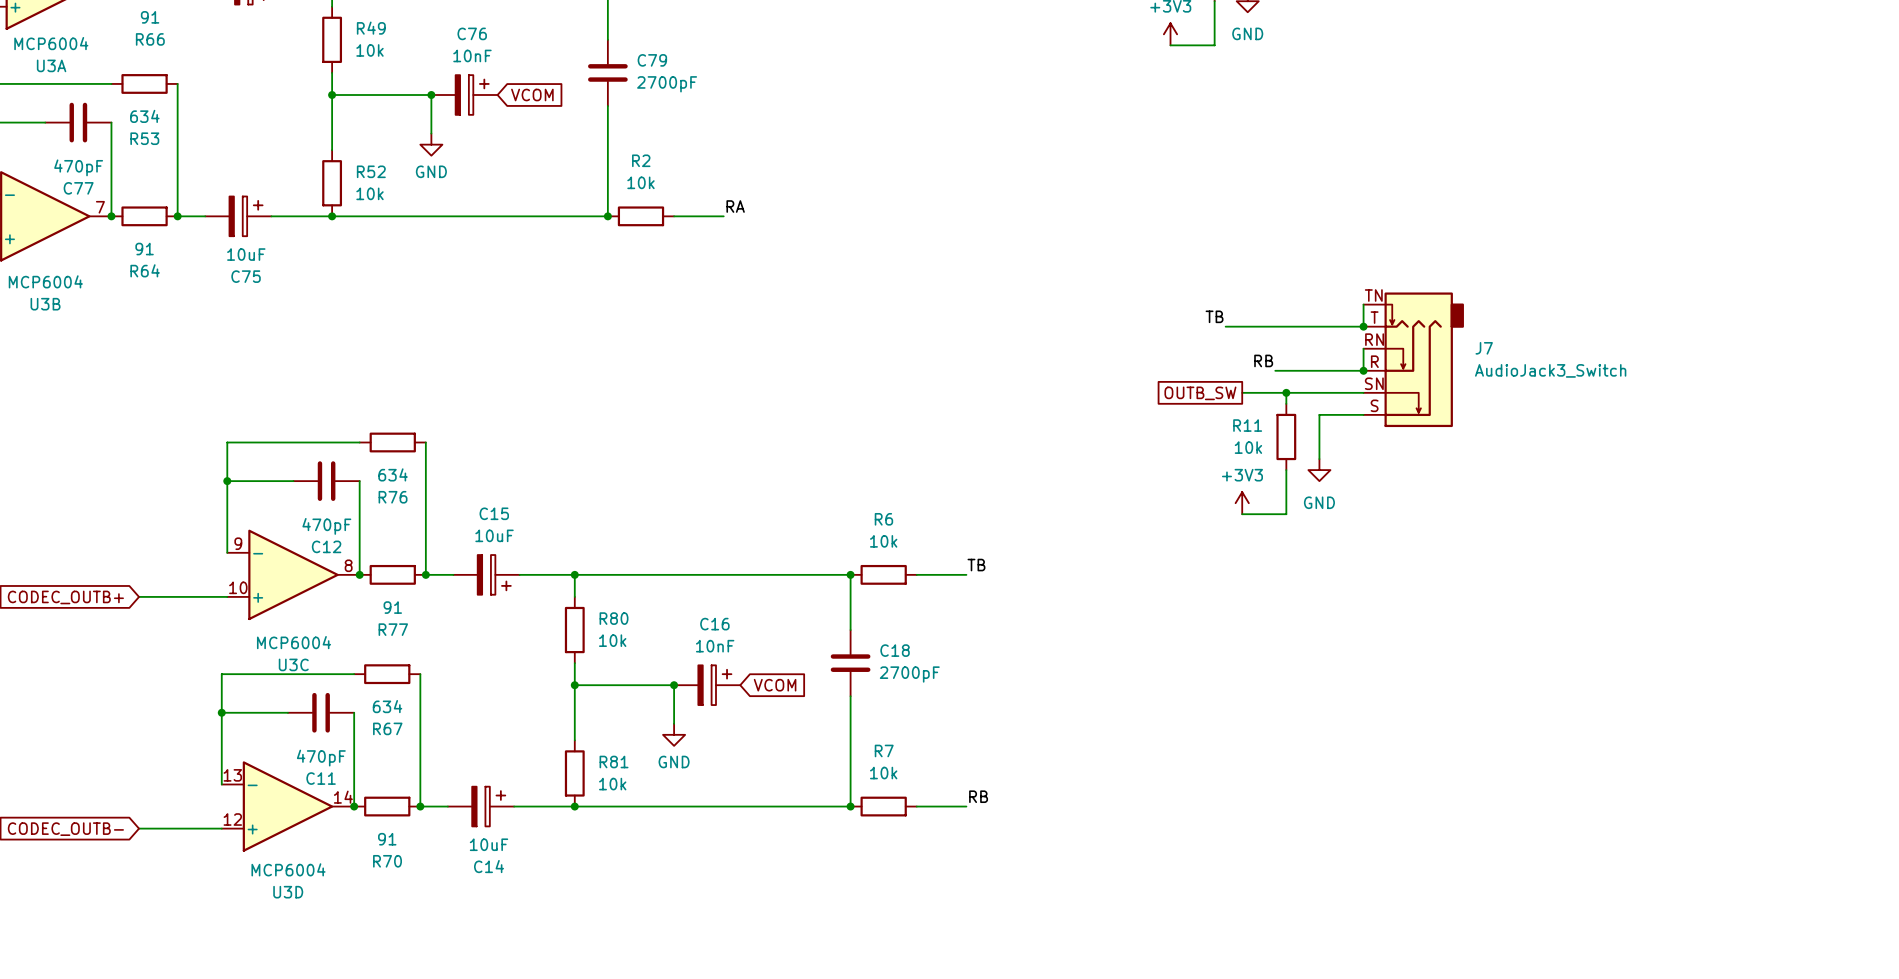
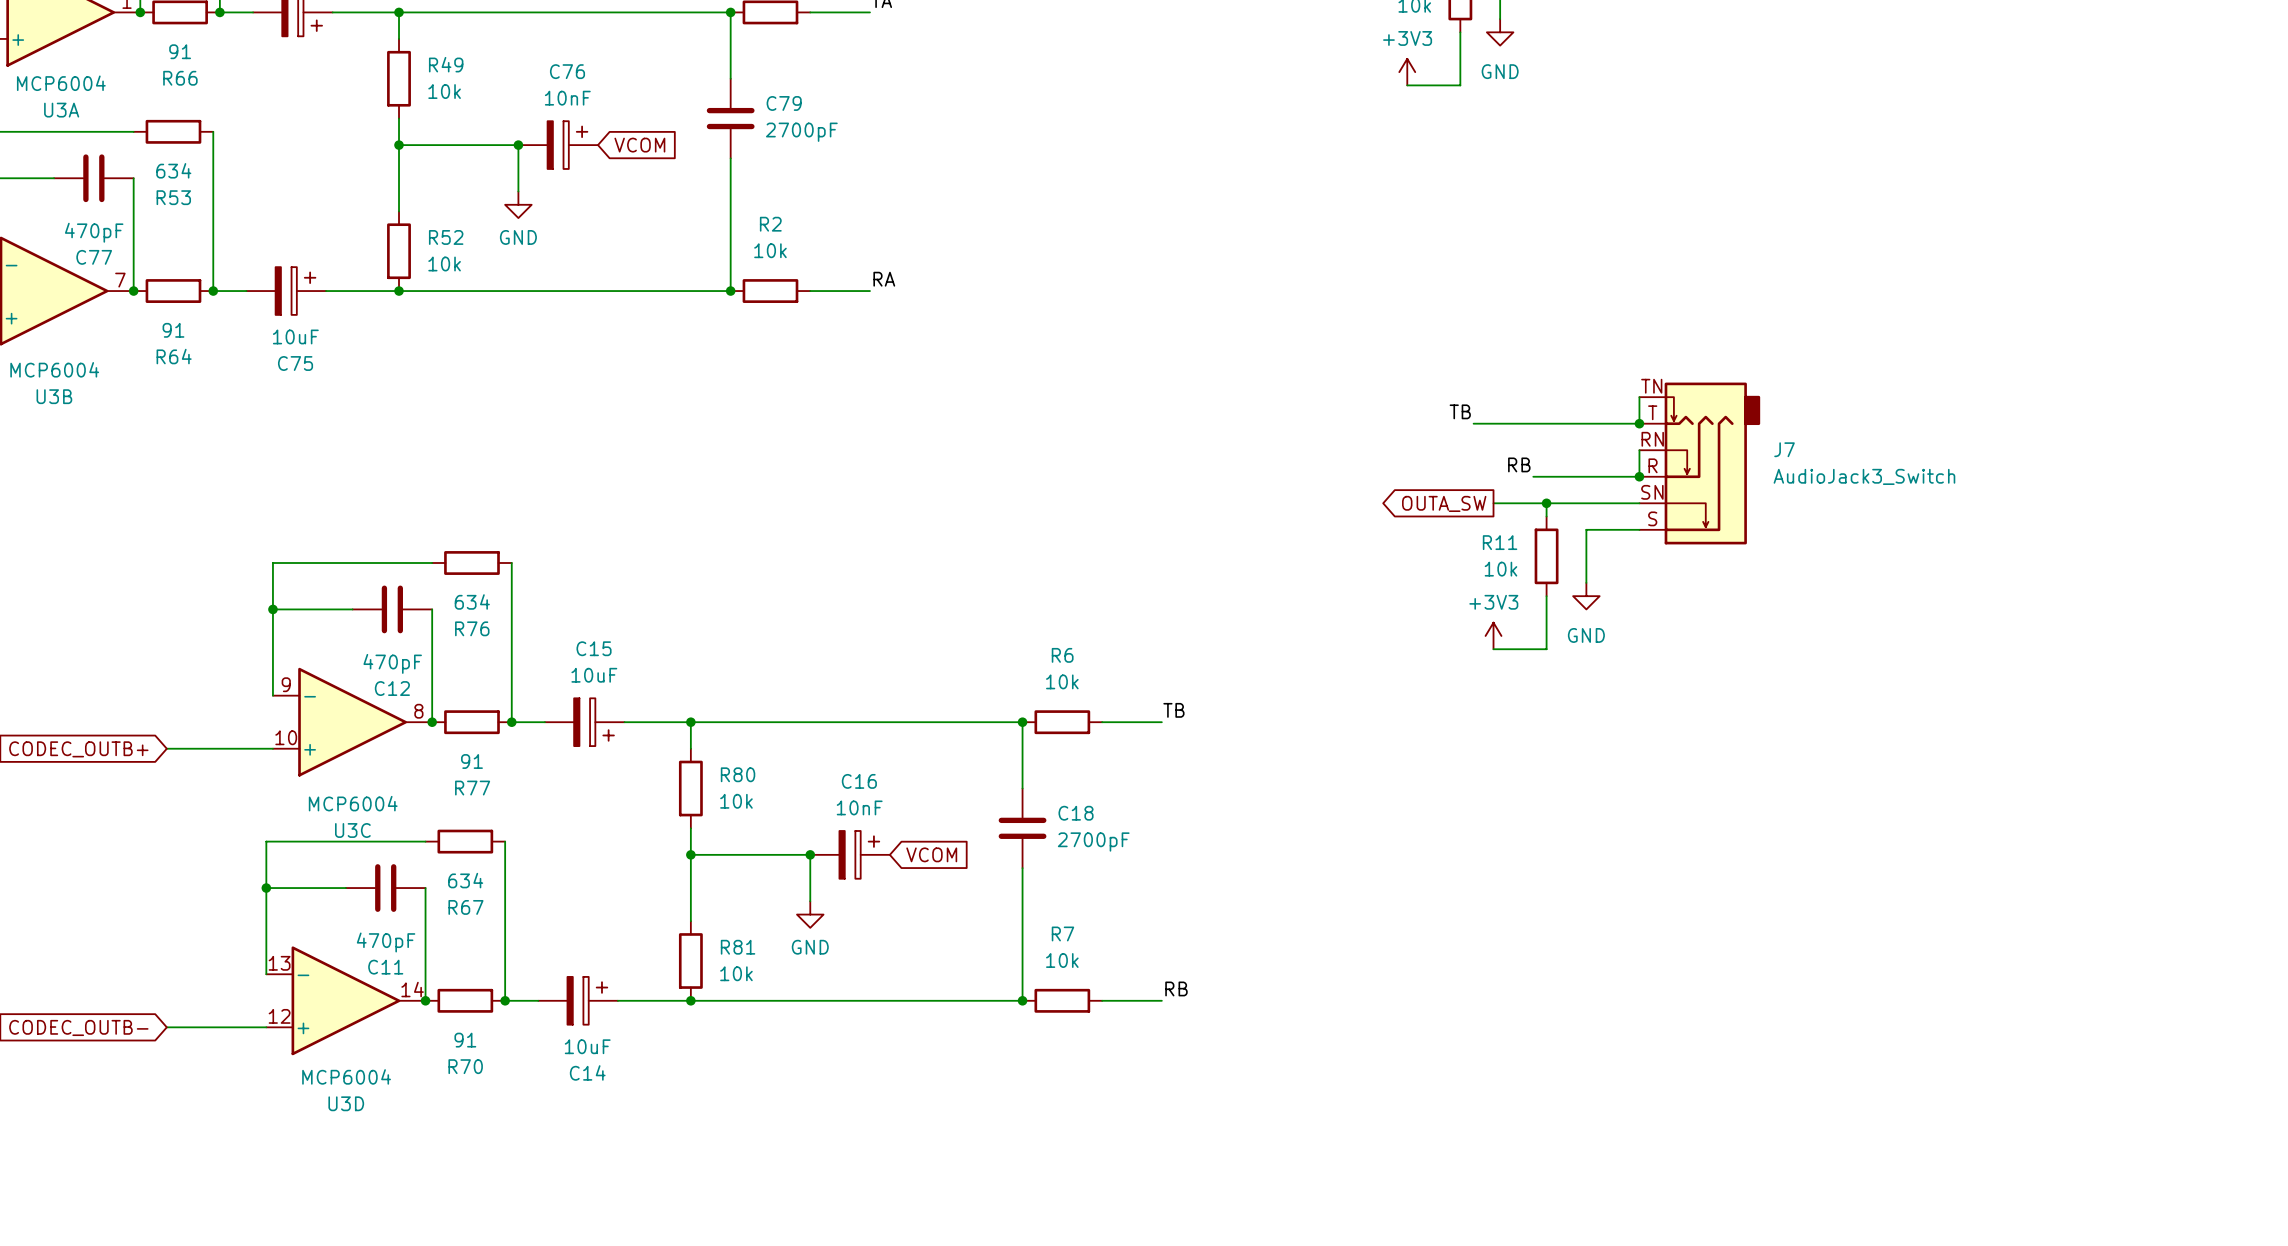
global label shape: passive (1200, 393) -> output (1444, 503)
global label: OUTB_SW (1200, 393) -> OUTA_SW (1444, 503)

